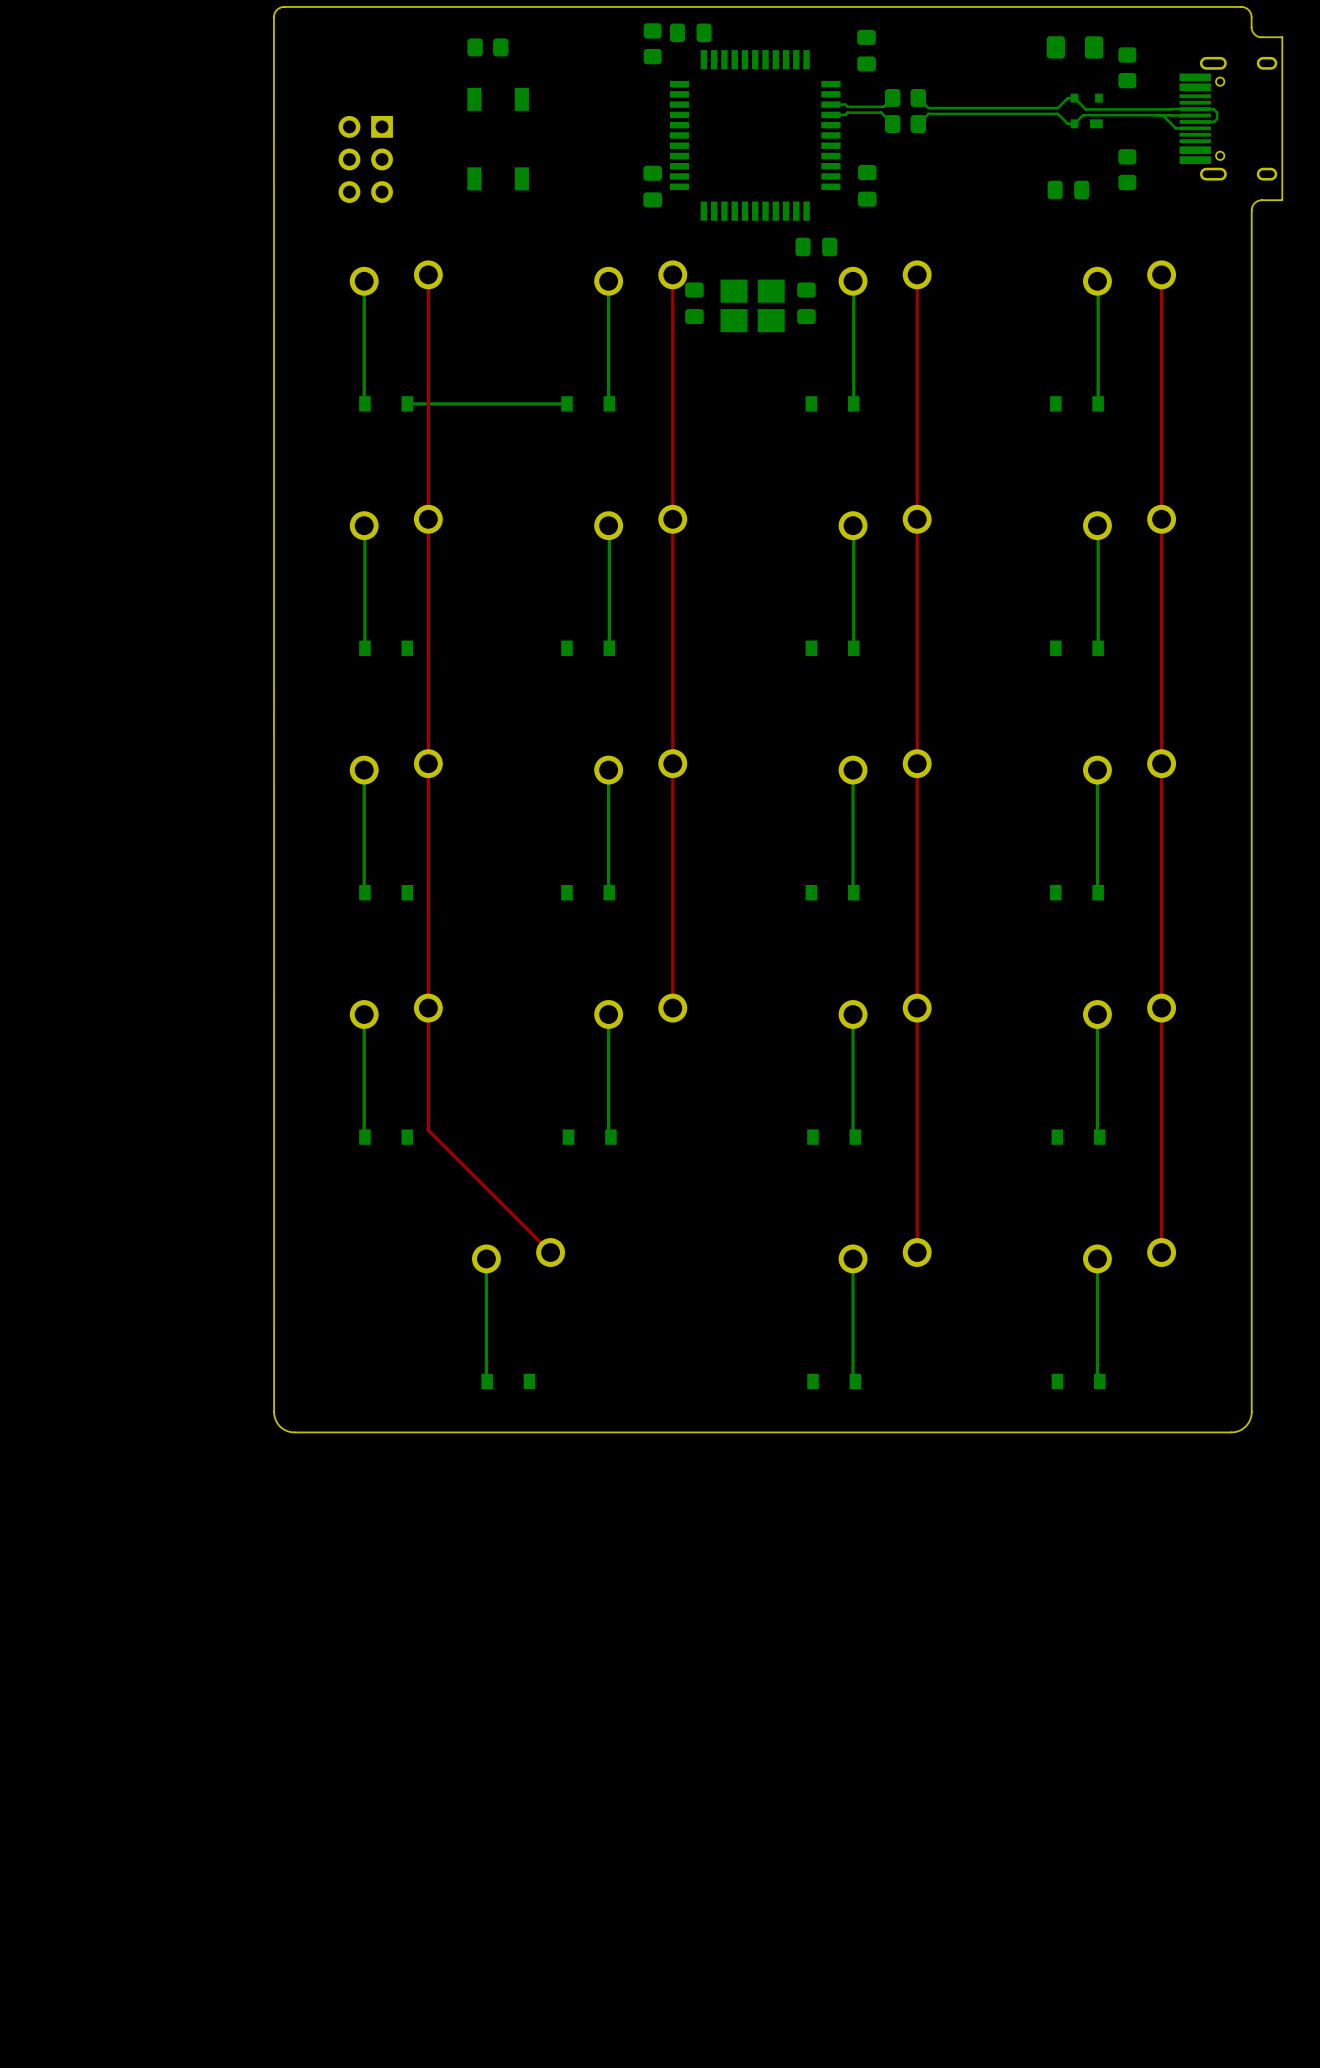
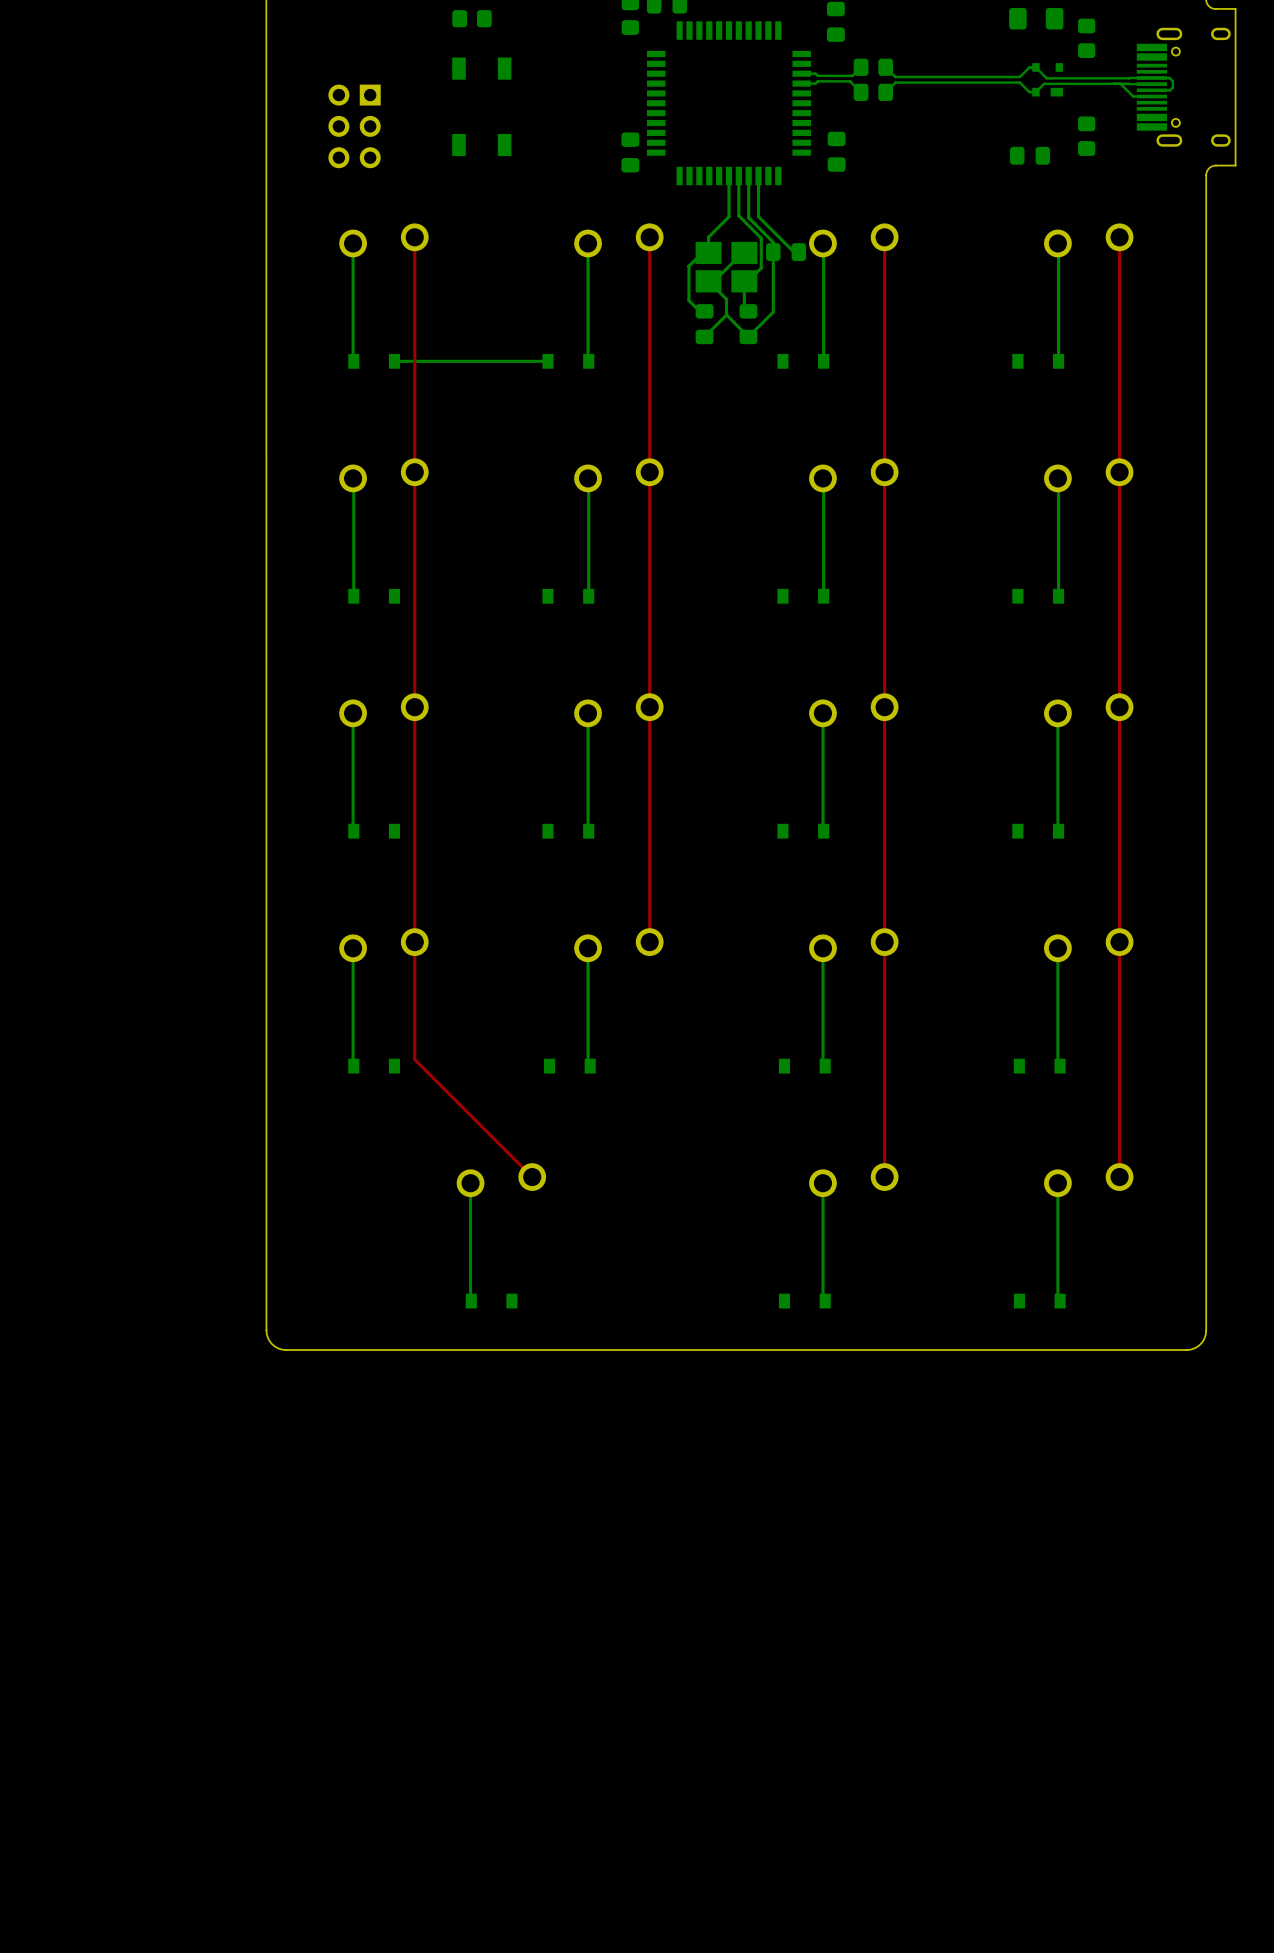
bottom track: none -> (728, 176) (728, 216) (708, 237) (708, 252) (702, 252) (688, 266) (688, 300) (699, 311) (704, 311)
bottom track: none -> (738, 176) (738, 215) (761, 238) (761, 268) (748, 281) (744, 281) (744, 307) (748, 311)
bottom track: none -> (748, 176) (748, 217) (773, 242) (773, 312) (748, 336) (726, 315)
bottom track: none -> (758, 176) (758, 216) (793, 252) (798, 250)
part: (816, 246) -> none
bottom track: none -> (744, 252) (714, 281) (708, 281) (726, 299) (726, 315)
part: (694, 303) -> none
part rotation: 0° (806, 303) -> 90° clockwise (786, 252)
bottom track: none -> (726, 315) (704, 336)
part: none -> (704, 324)
part: none -> (748, 324)

